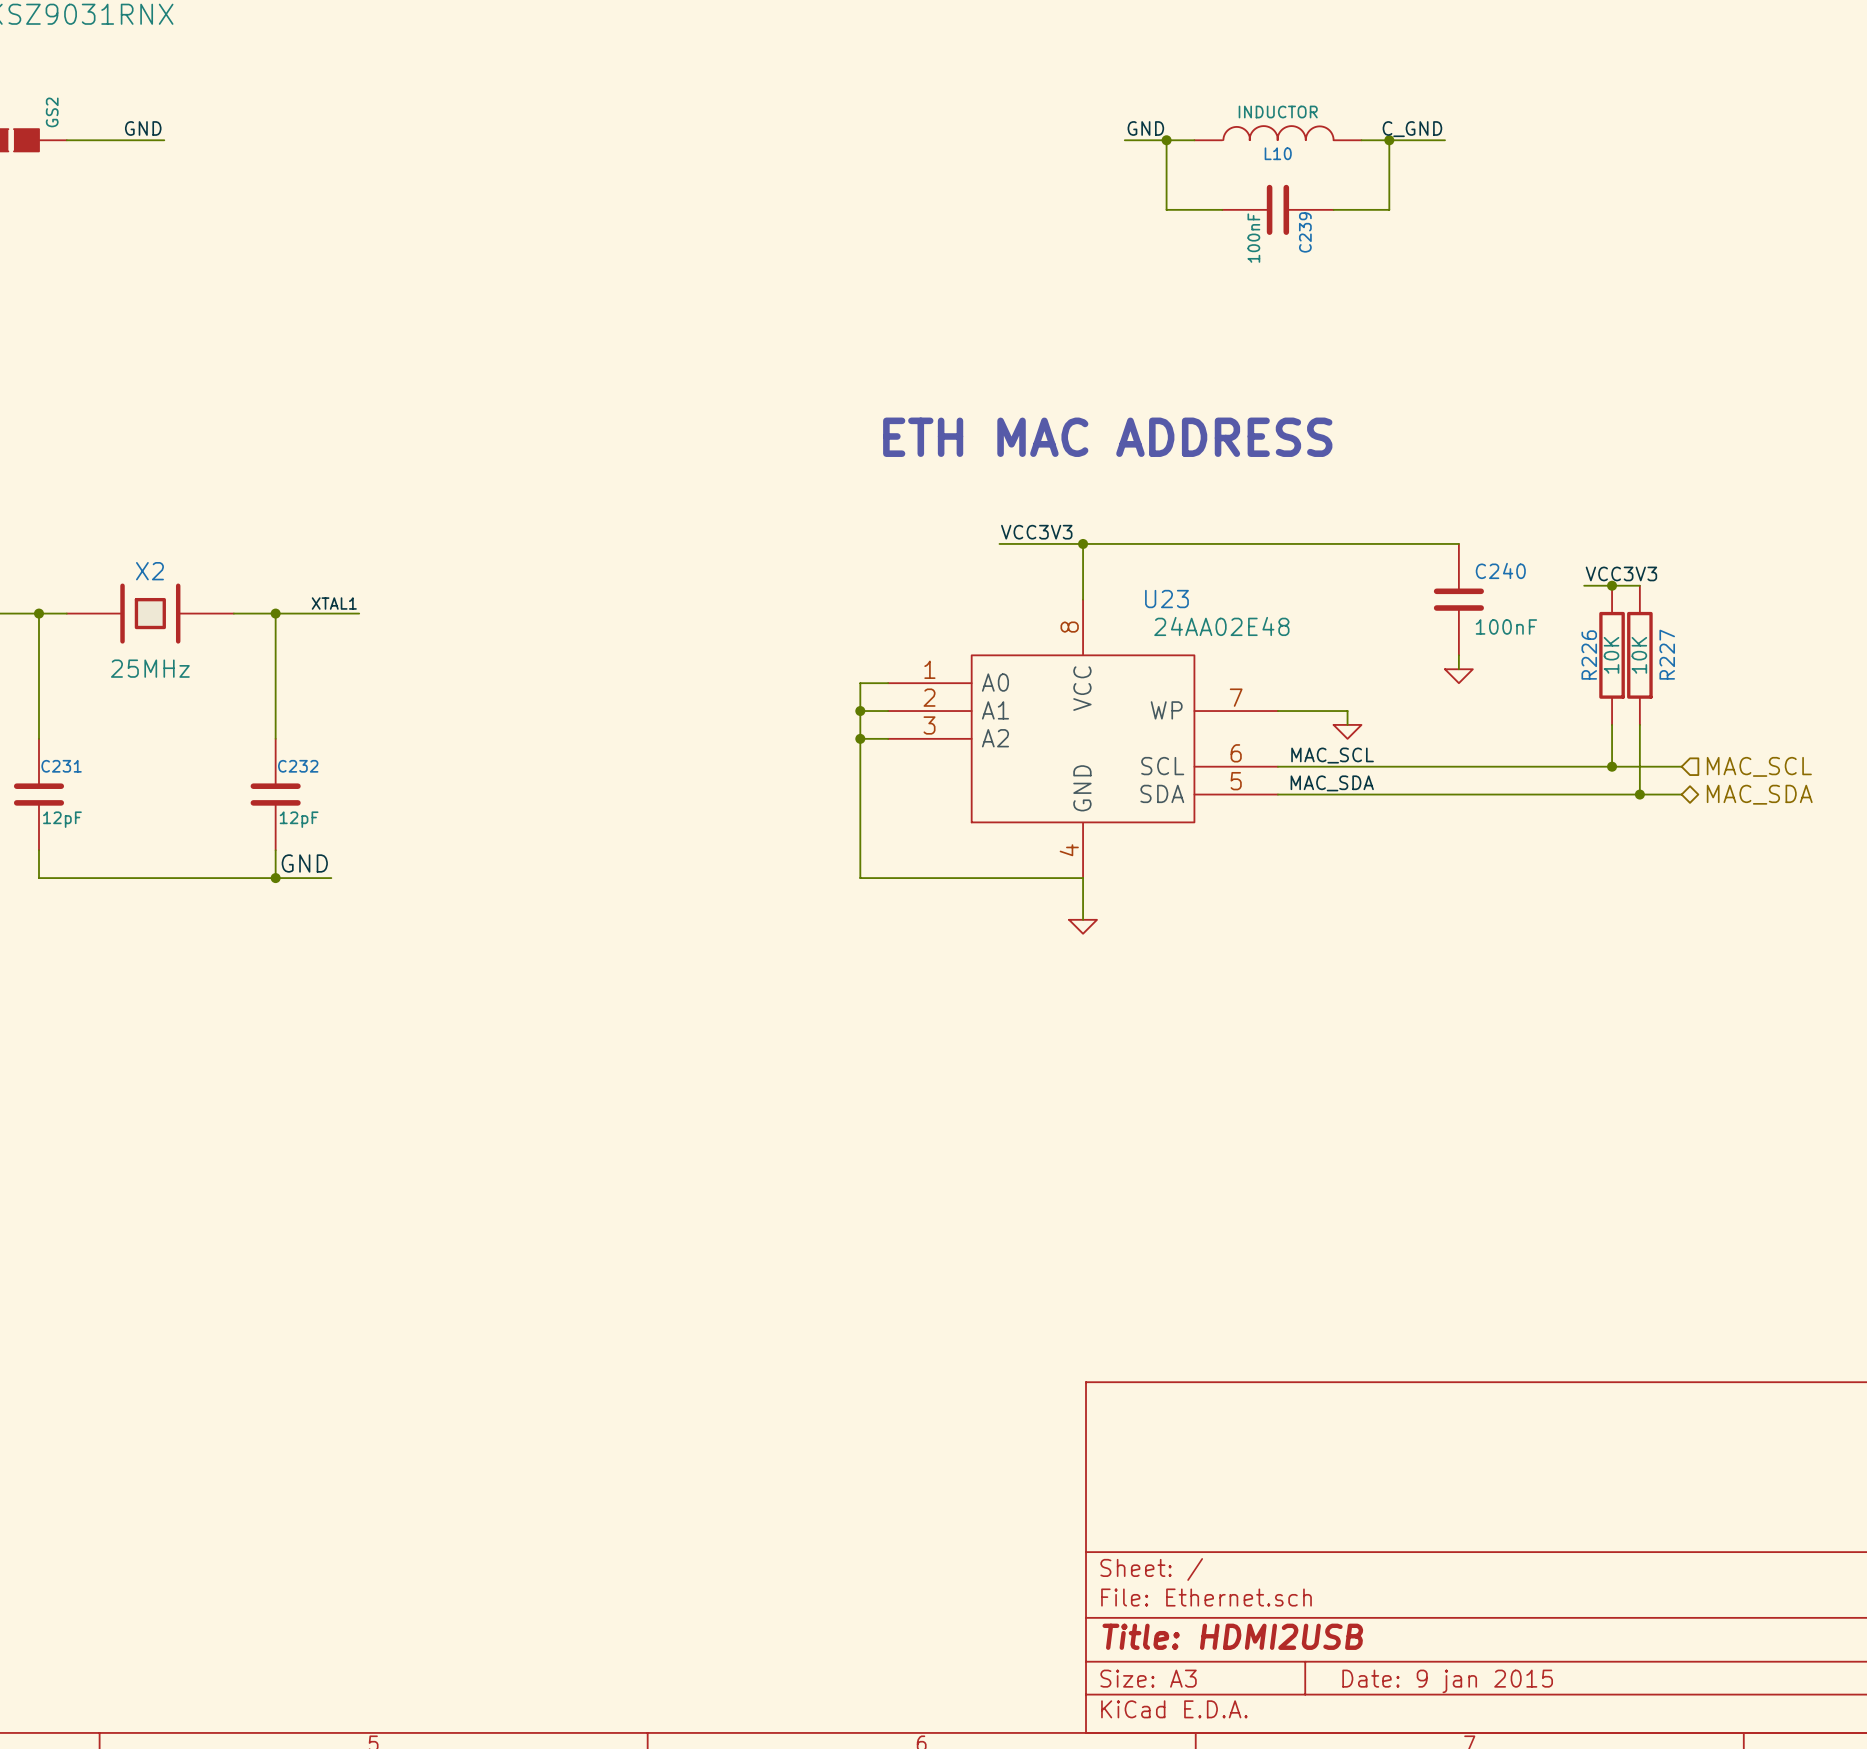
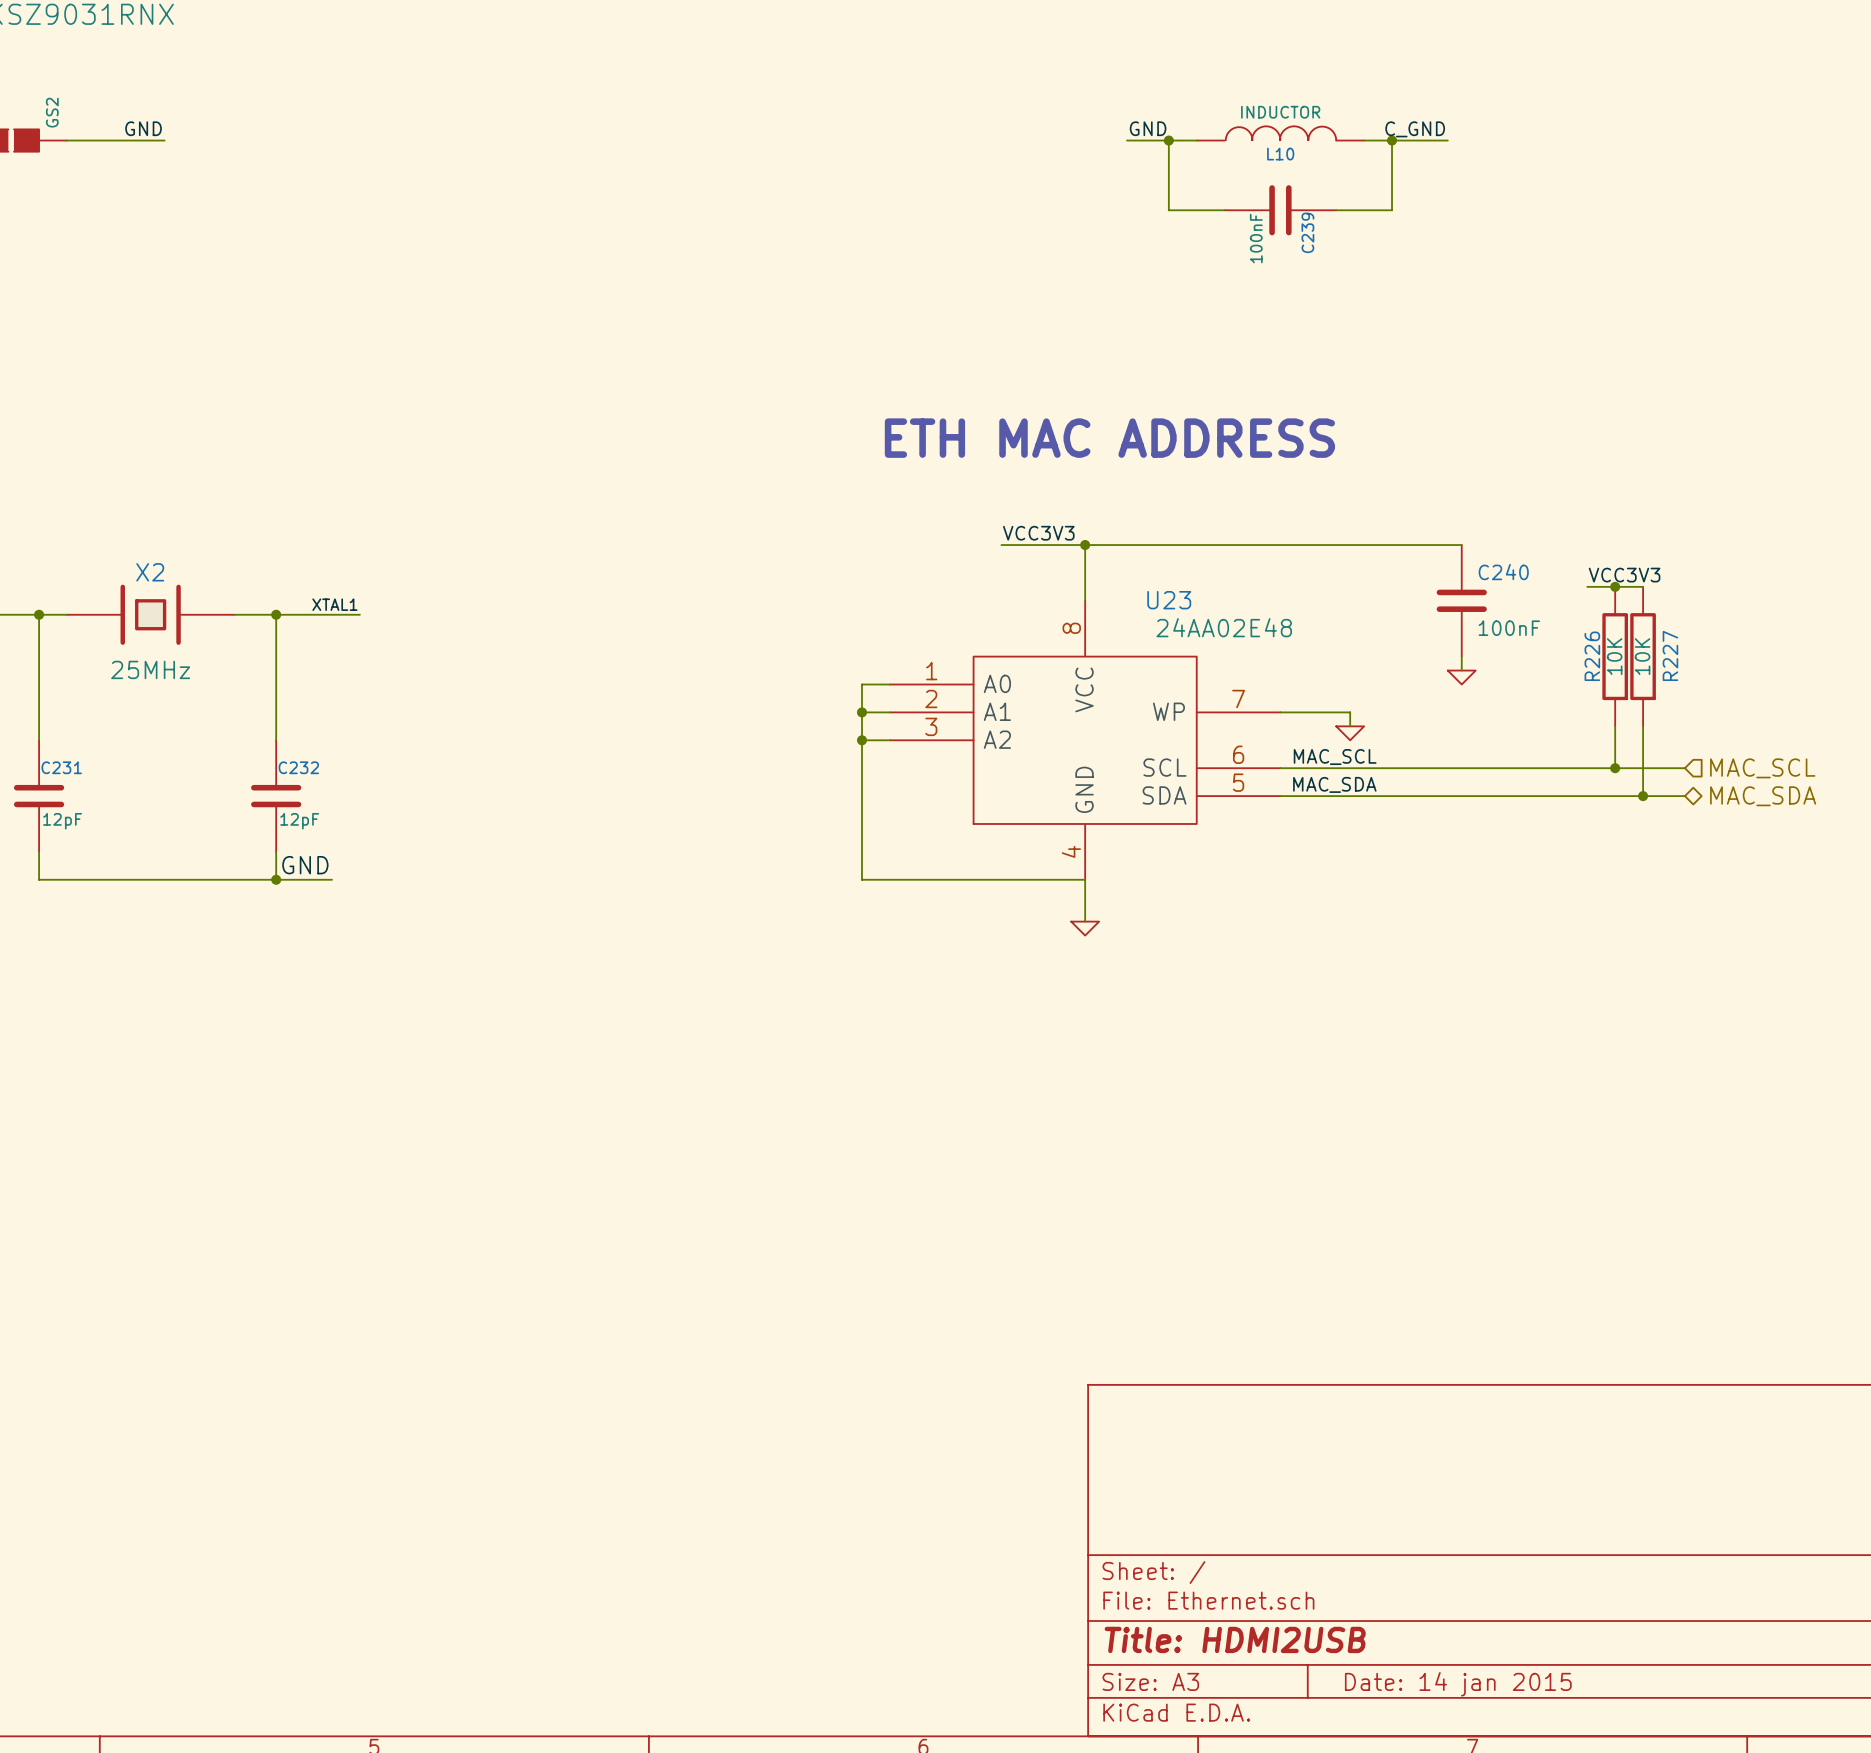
title block: Date: 9 jan 2015 (1447, 1681) -> Date: 14 jan 2015 (1458, 1684)

